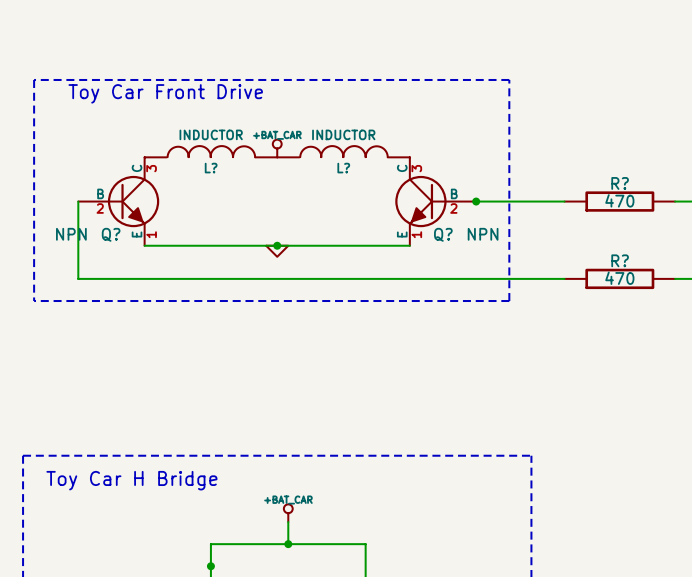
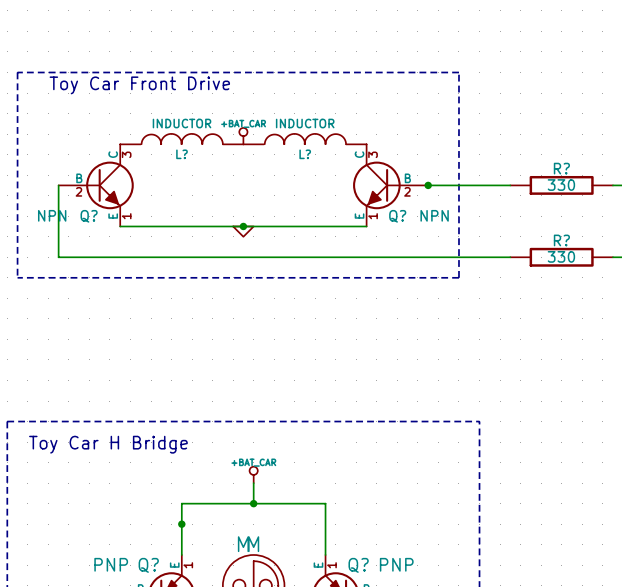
R? value: 470 (619, 200) -> 330 (561, 185)
R? value: 470 (619, 278) -> 330 (561, 256)

